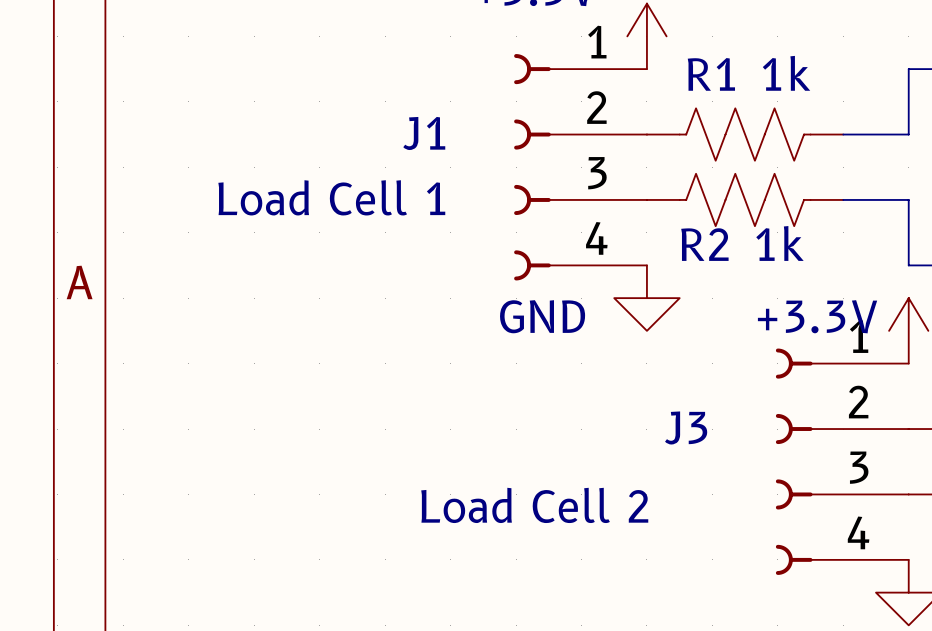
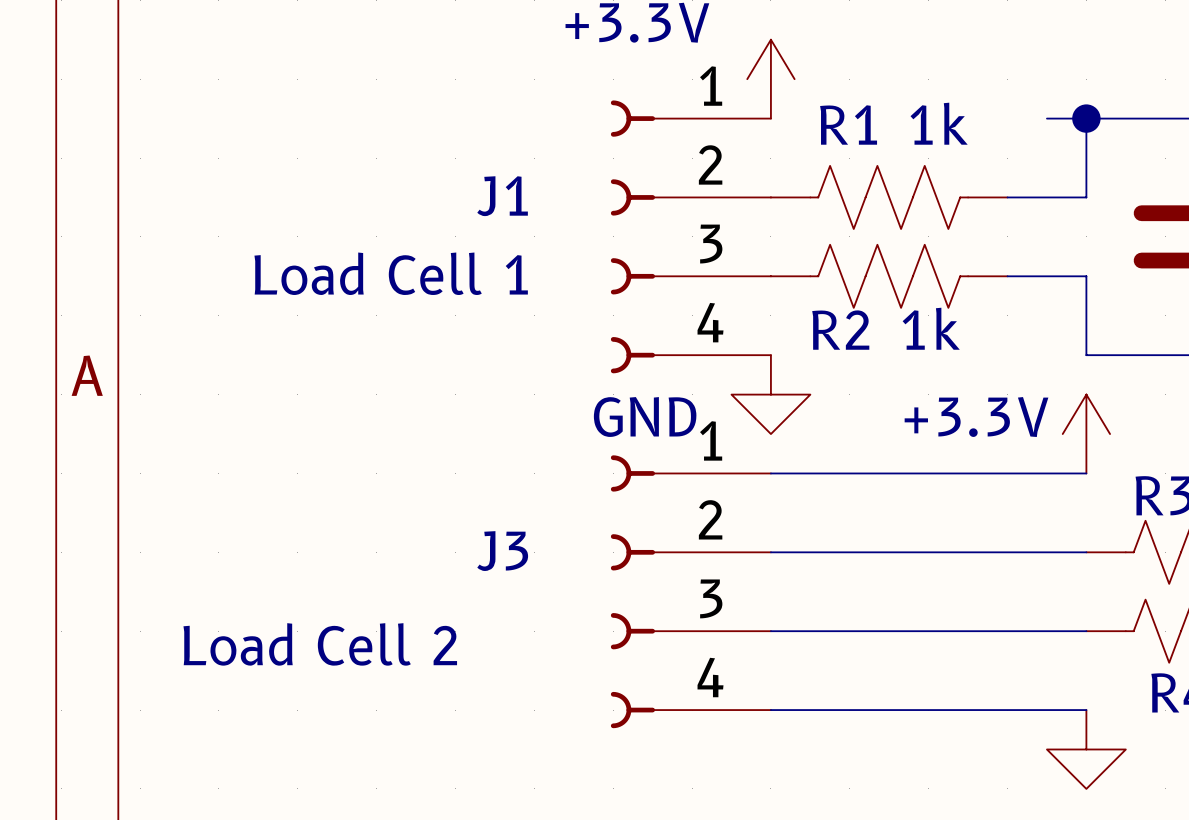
wire: none -> (1046, 118) (1086, 118)
junction: none -> (1086, 118)
wire: none -> (770, 473) (1086, 473)
wire: none -> (770, 552) (1086, 552)
J3 position: (842, 461) -> (690, 591)
wire: none -> (770, 631) (1086, 631)
wire: none -> (770, 710) (1086, 710)

